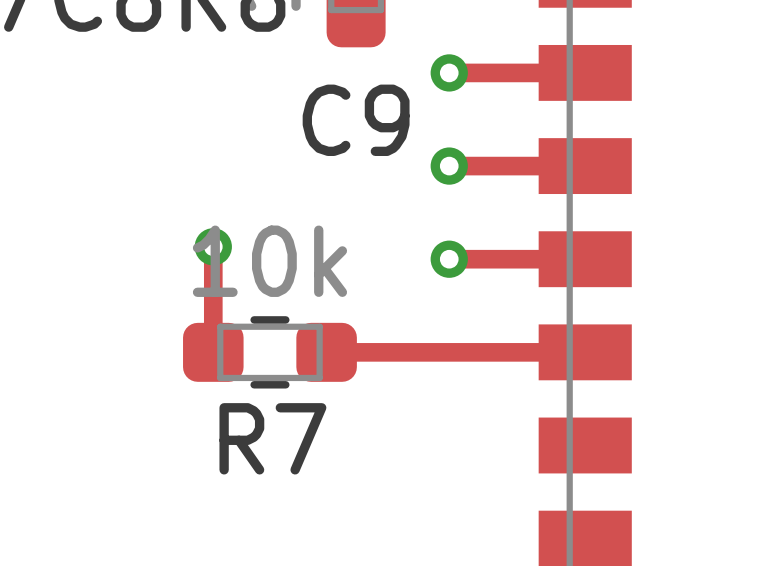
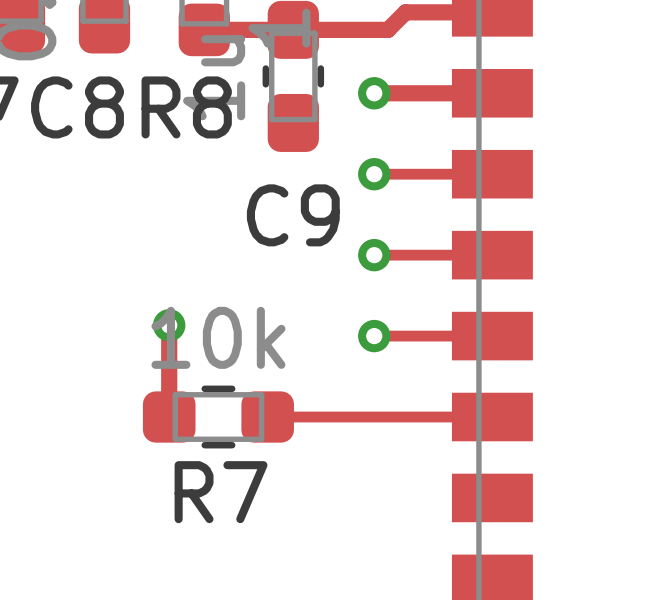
track width: thick (449, 72) (585, 72) -> thin (374, 174) (492, 174)
track width: thick (449, 166) (585, 166) -> thin (374, 255) (492, 255)
track width: thick (449, 259) (585, 259) -> thin (374, 336) (492, 336)
track width: thick (326, 352) (585, 352) -> thin (267, 417) (492, 417)

